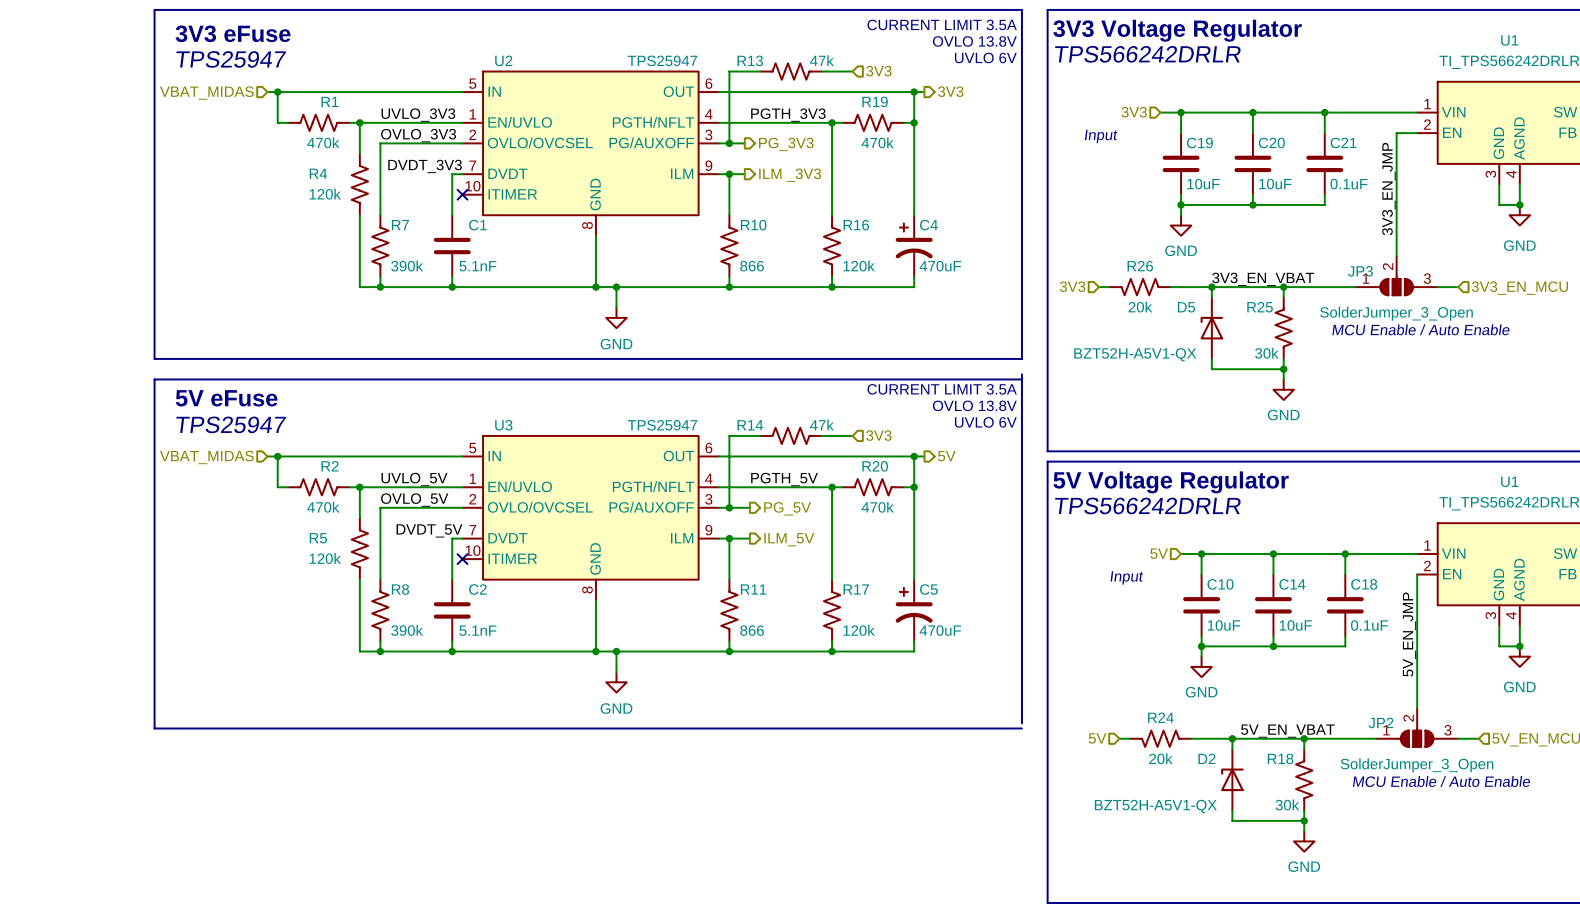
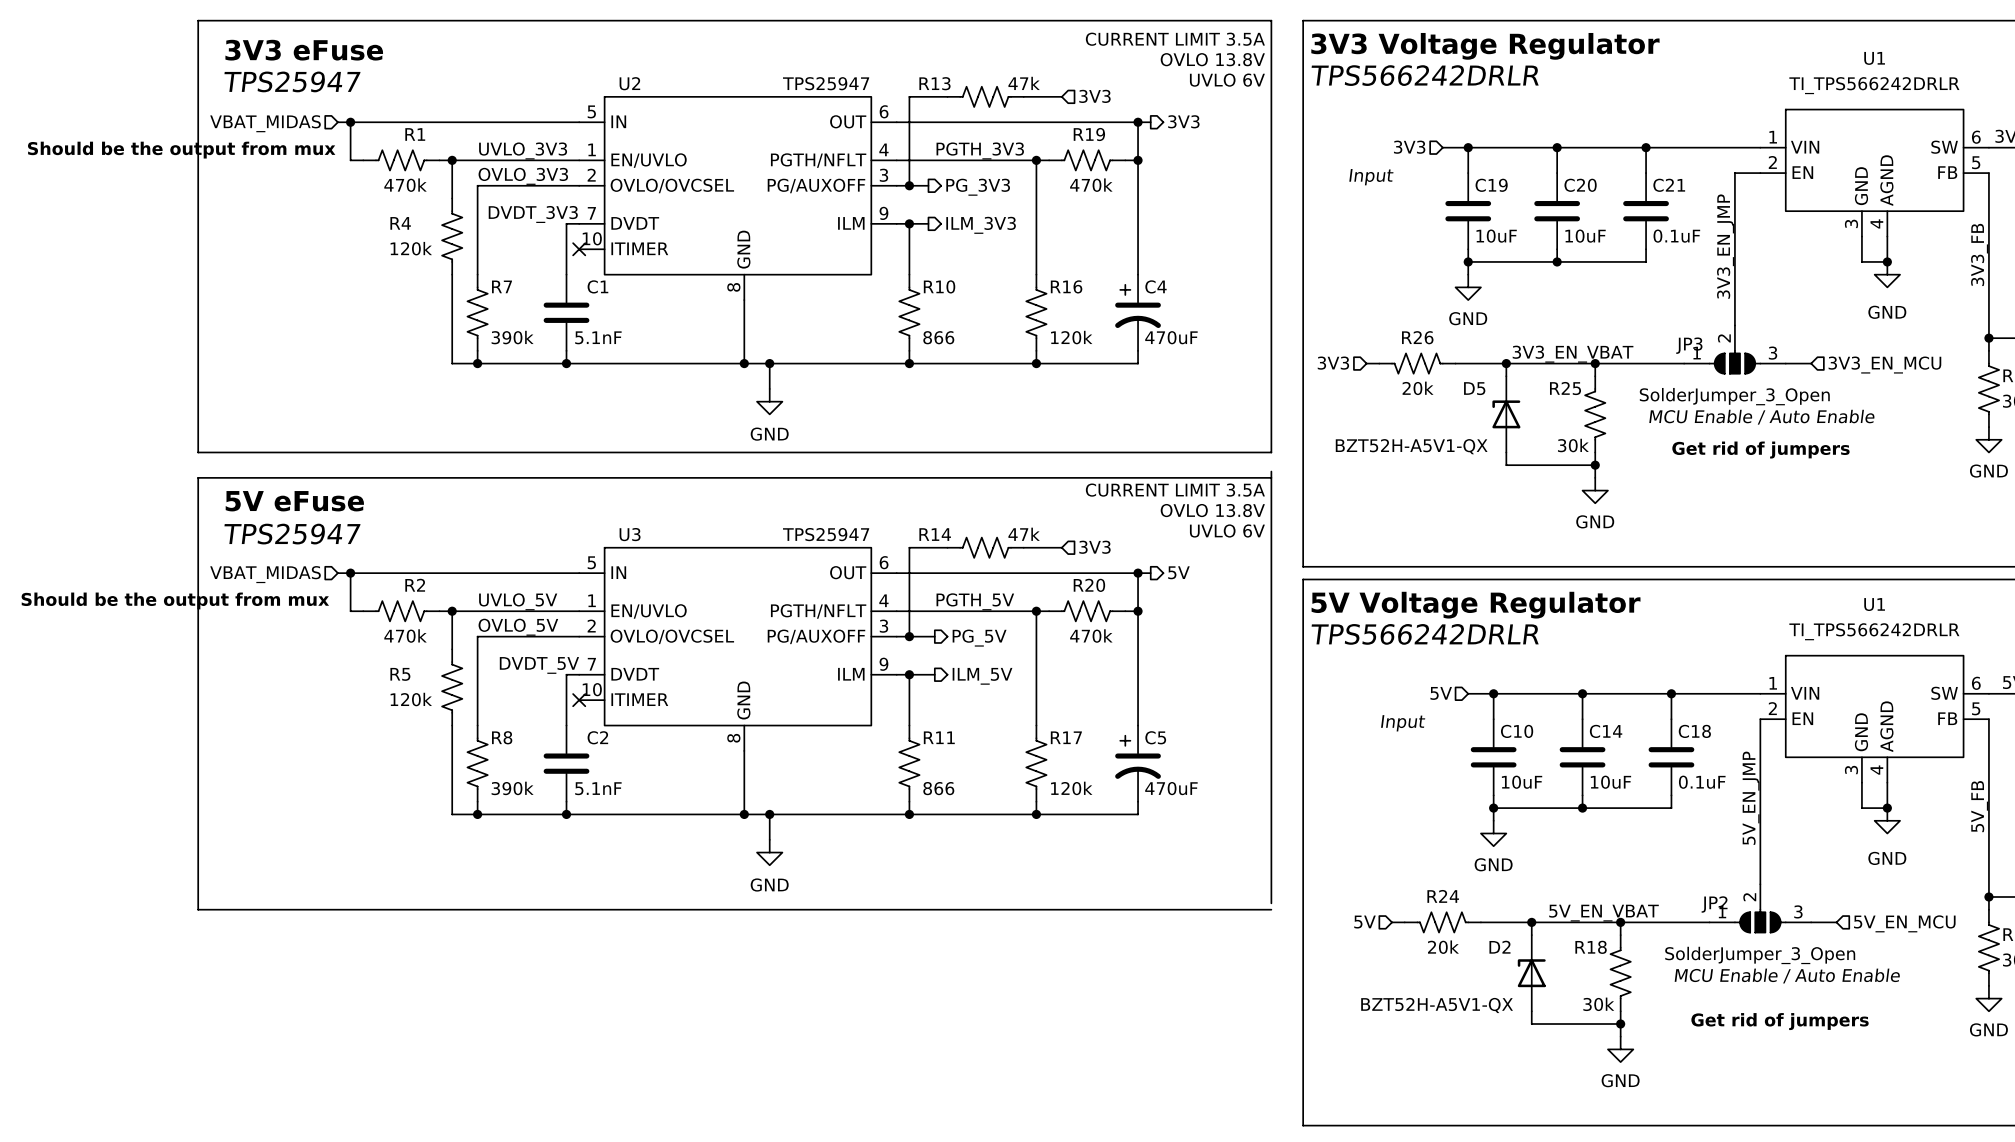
text: none -> Should be the output from mux (181, 150)
hierarchical label: ILM _3V3 (790, 175) -> ILM_3V3 (981, 225)
text: none -> Get rid of jumpers (1760, 450)
text: none -> Should be the output from mux (175, 600)
text: none -> Get rid of jumpers (1780, 1021)

